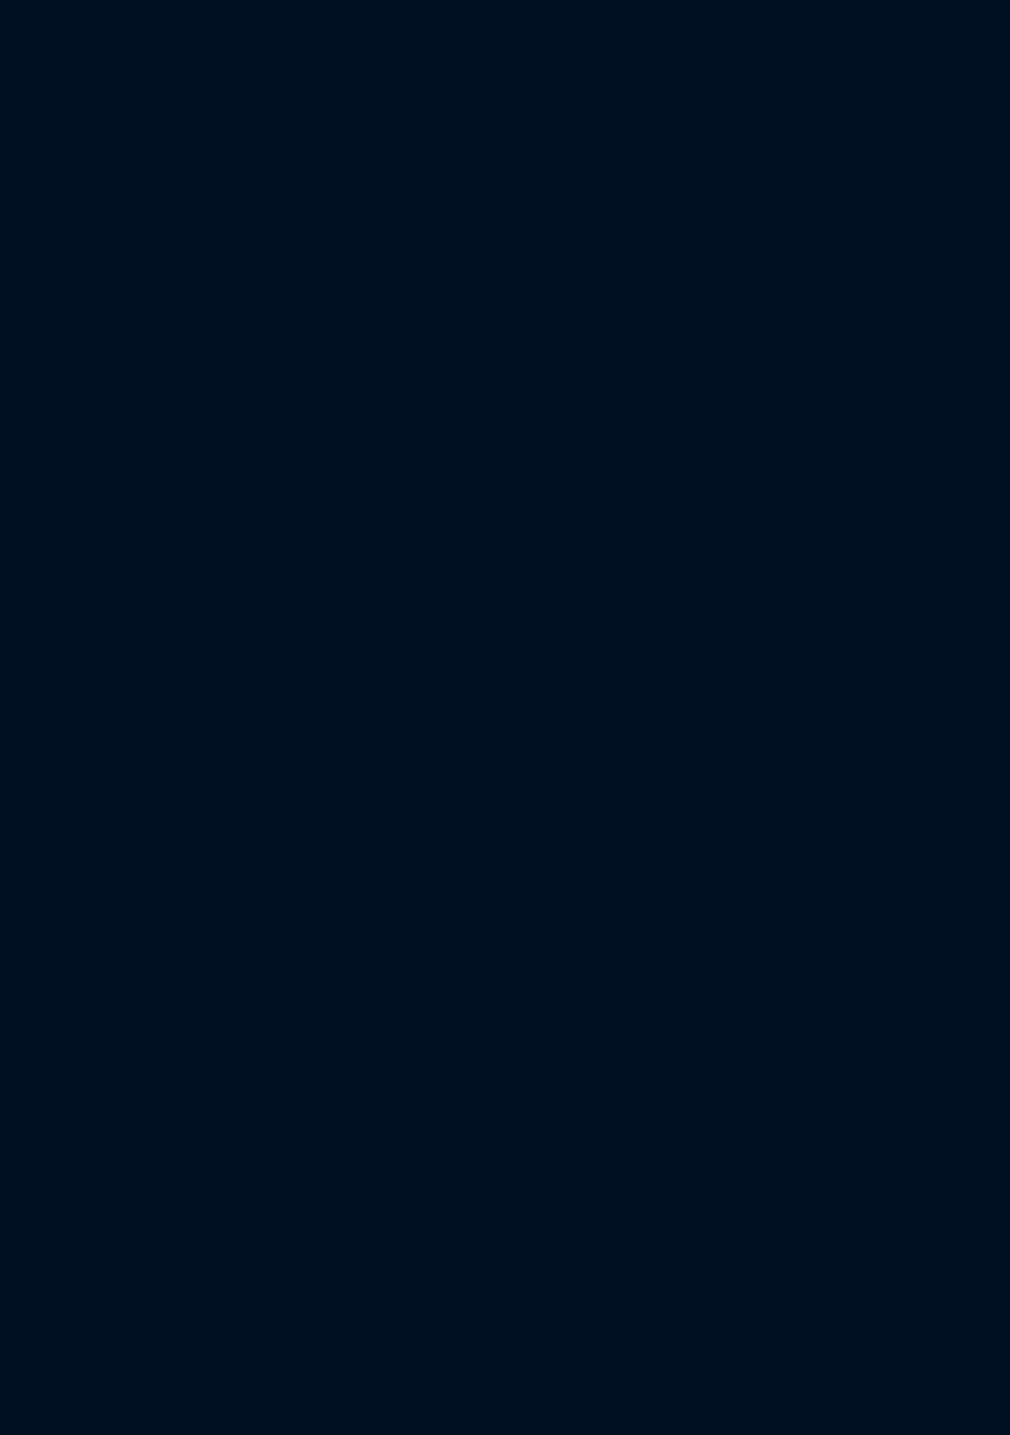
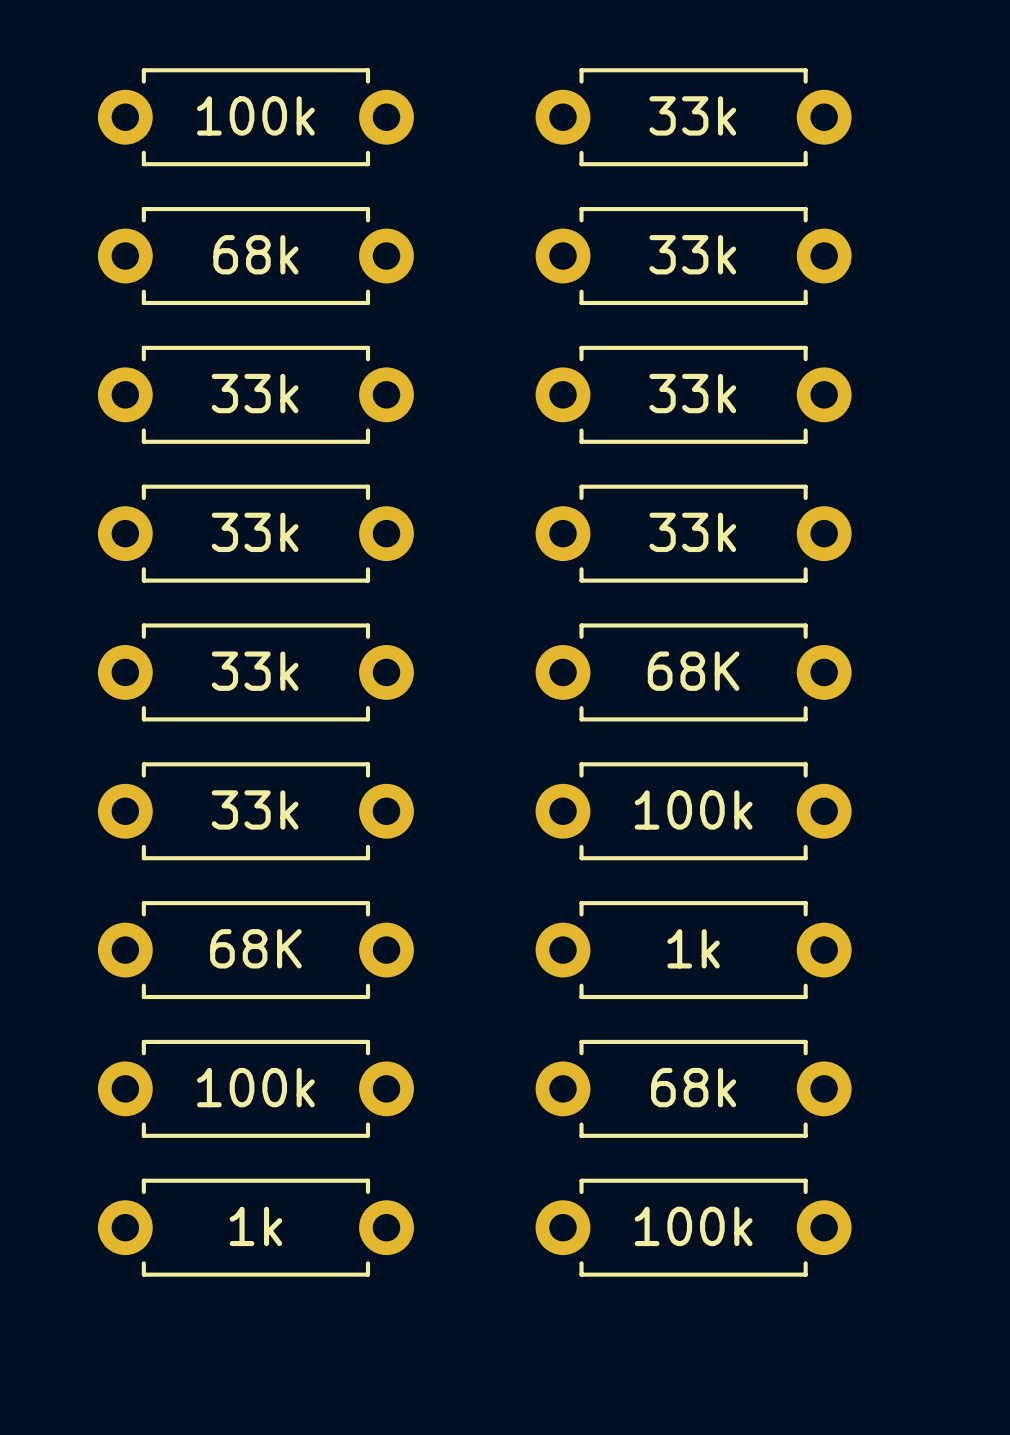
part: none -> 100k (255, 117)
part: none -> 33k (693, 117)
part: none -> 68k (255, 256)
part: none -> 33k (693, 256)
part: none -> 33k (255, 394)
part: none -> 33k (693, 394)
part: none -> 33k (255, 533)
part: none -> 33k (693, 533)
part: none -> 33k (255, 672)
part: none -> 68K (693, 672)
part: none -> 33k (255, 811)
part: none -> 100k (693, 811)
part: none -> 68K (255, 950)
part: none -> 1k (693, 950)
part: none -> 100k (255, 1088)
part: none -> 68k (693, 1088)
part: none -> 1k (255, 1227)
part: none -> 100k (693, 1227)

